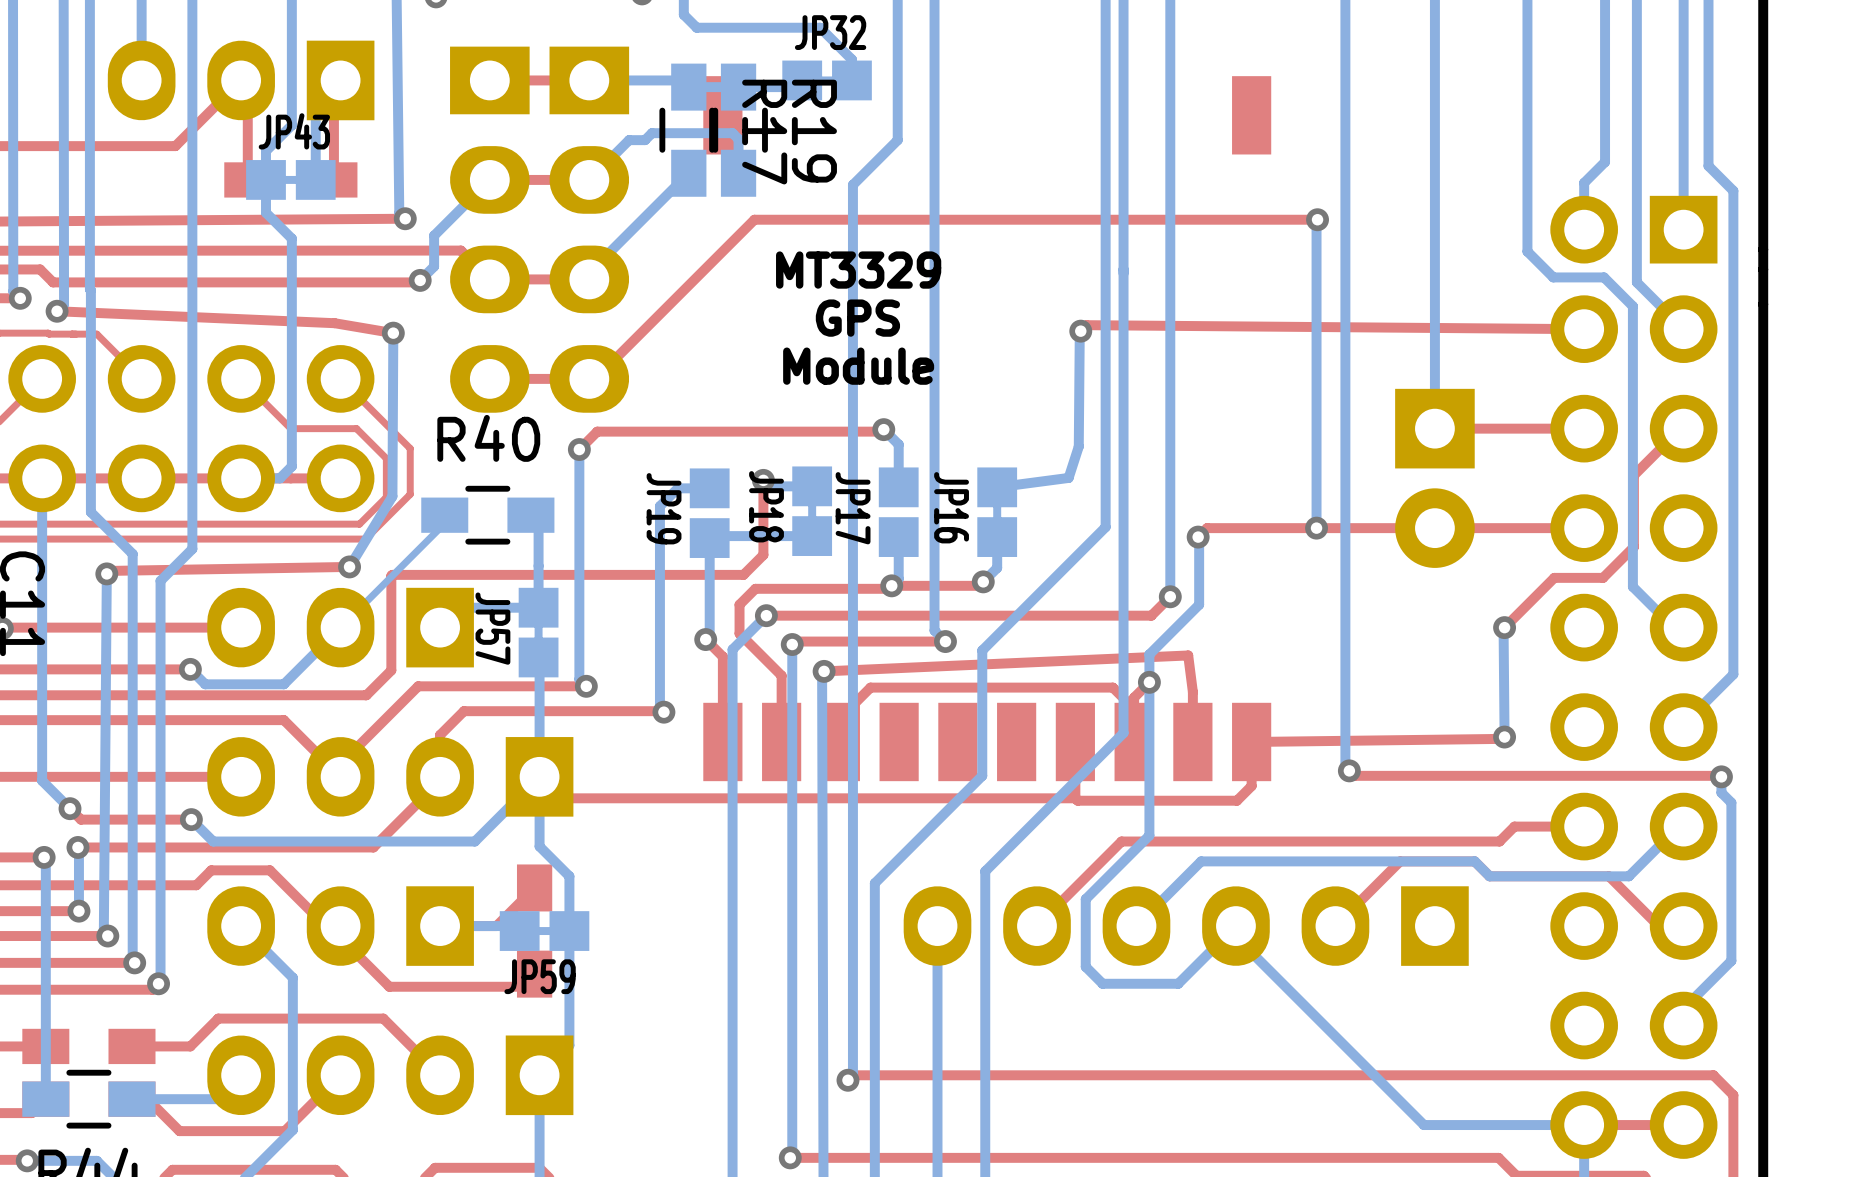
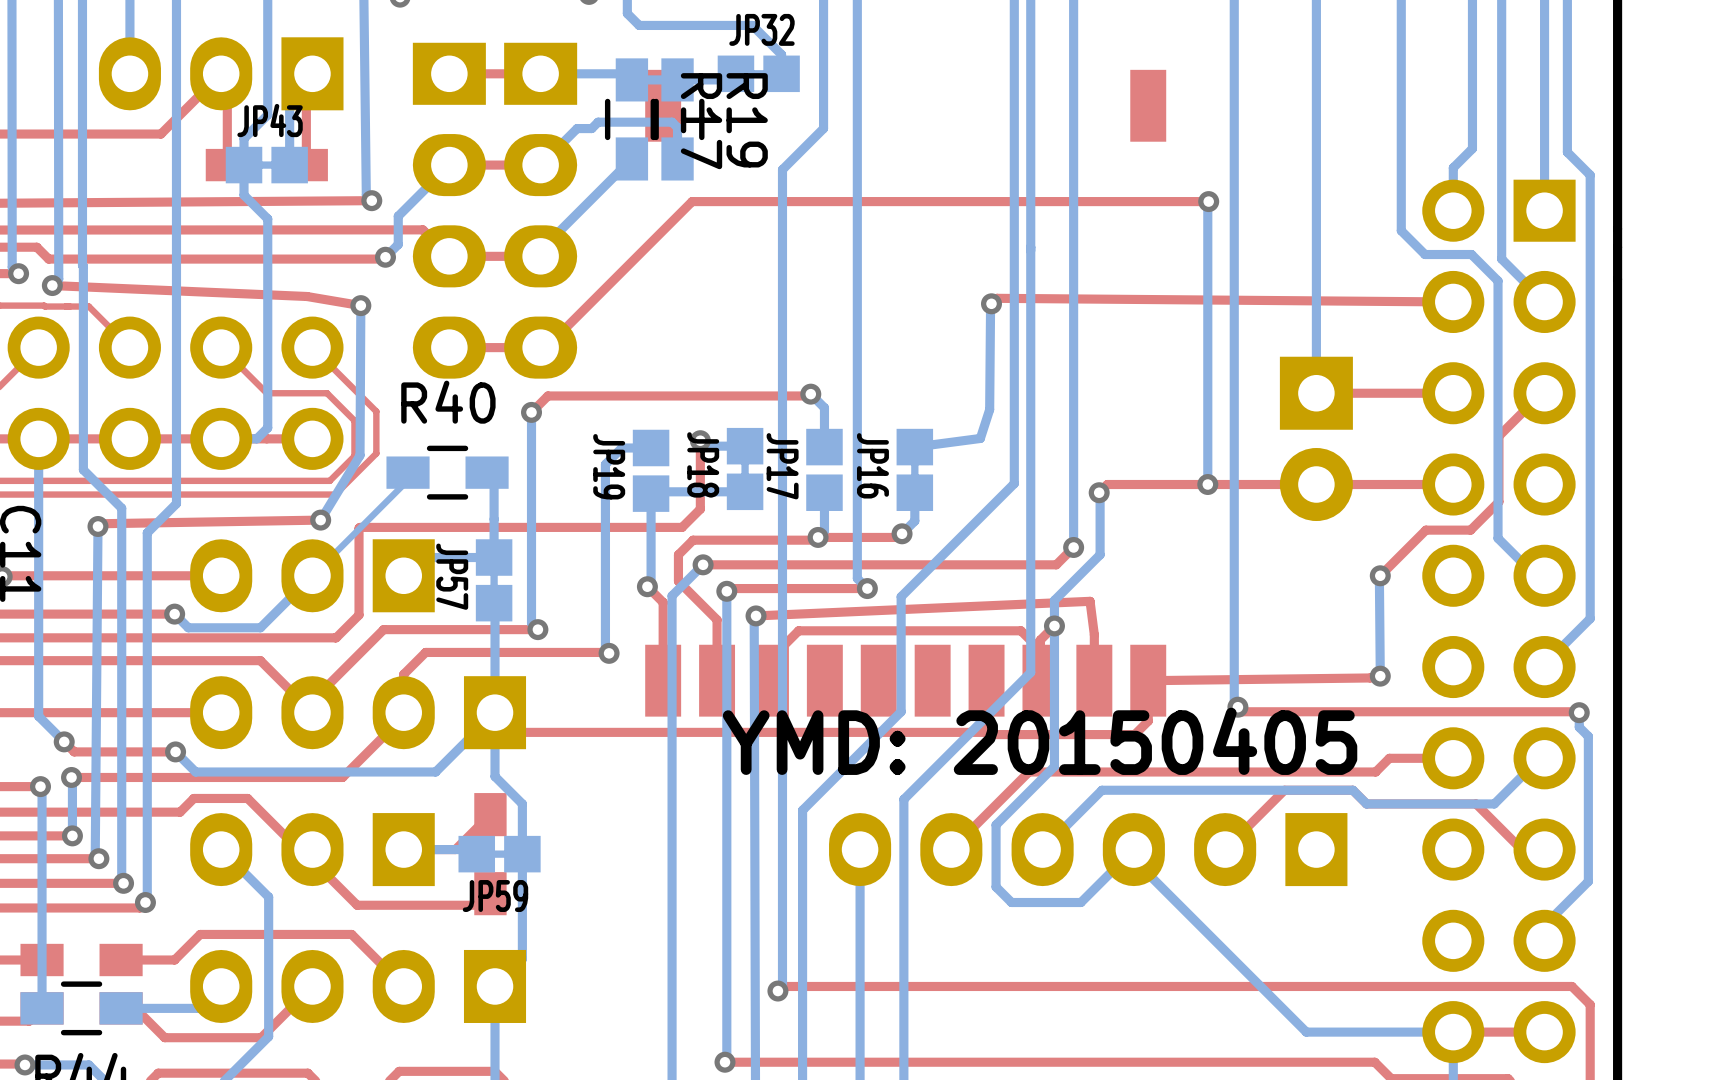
text: MT3329 (858, 270) -> none
text: GPS (857, 318) -> none
text: Module (858, 366) -> none
text: none -> YMD: 20150405 (1040, 741)

